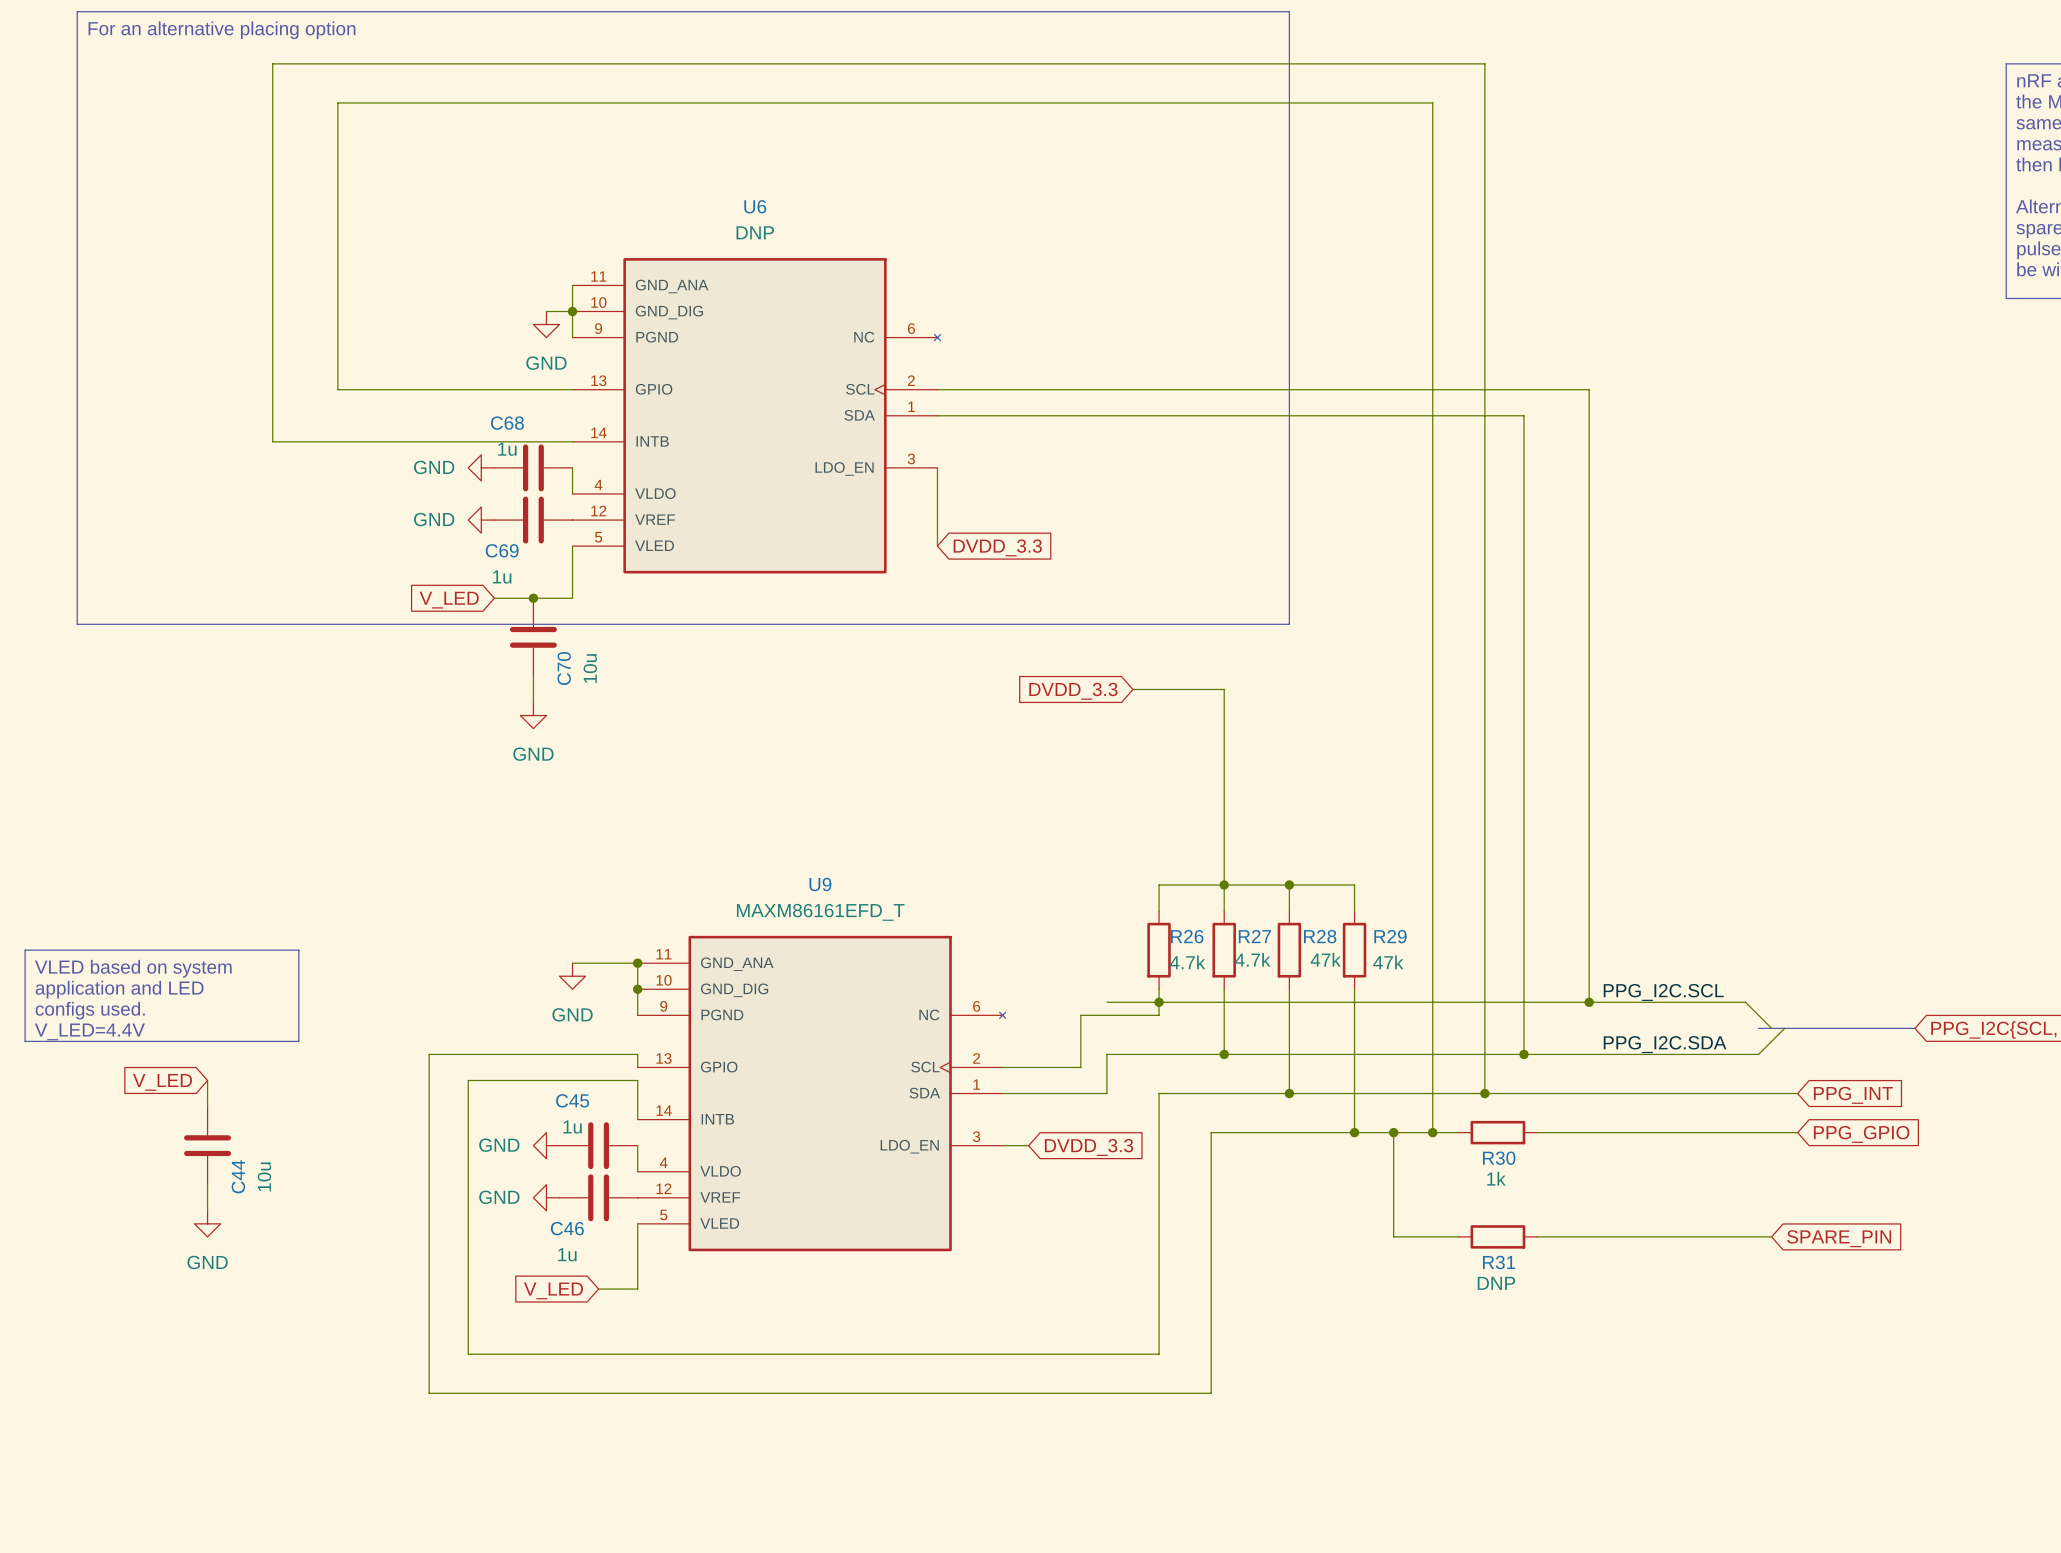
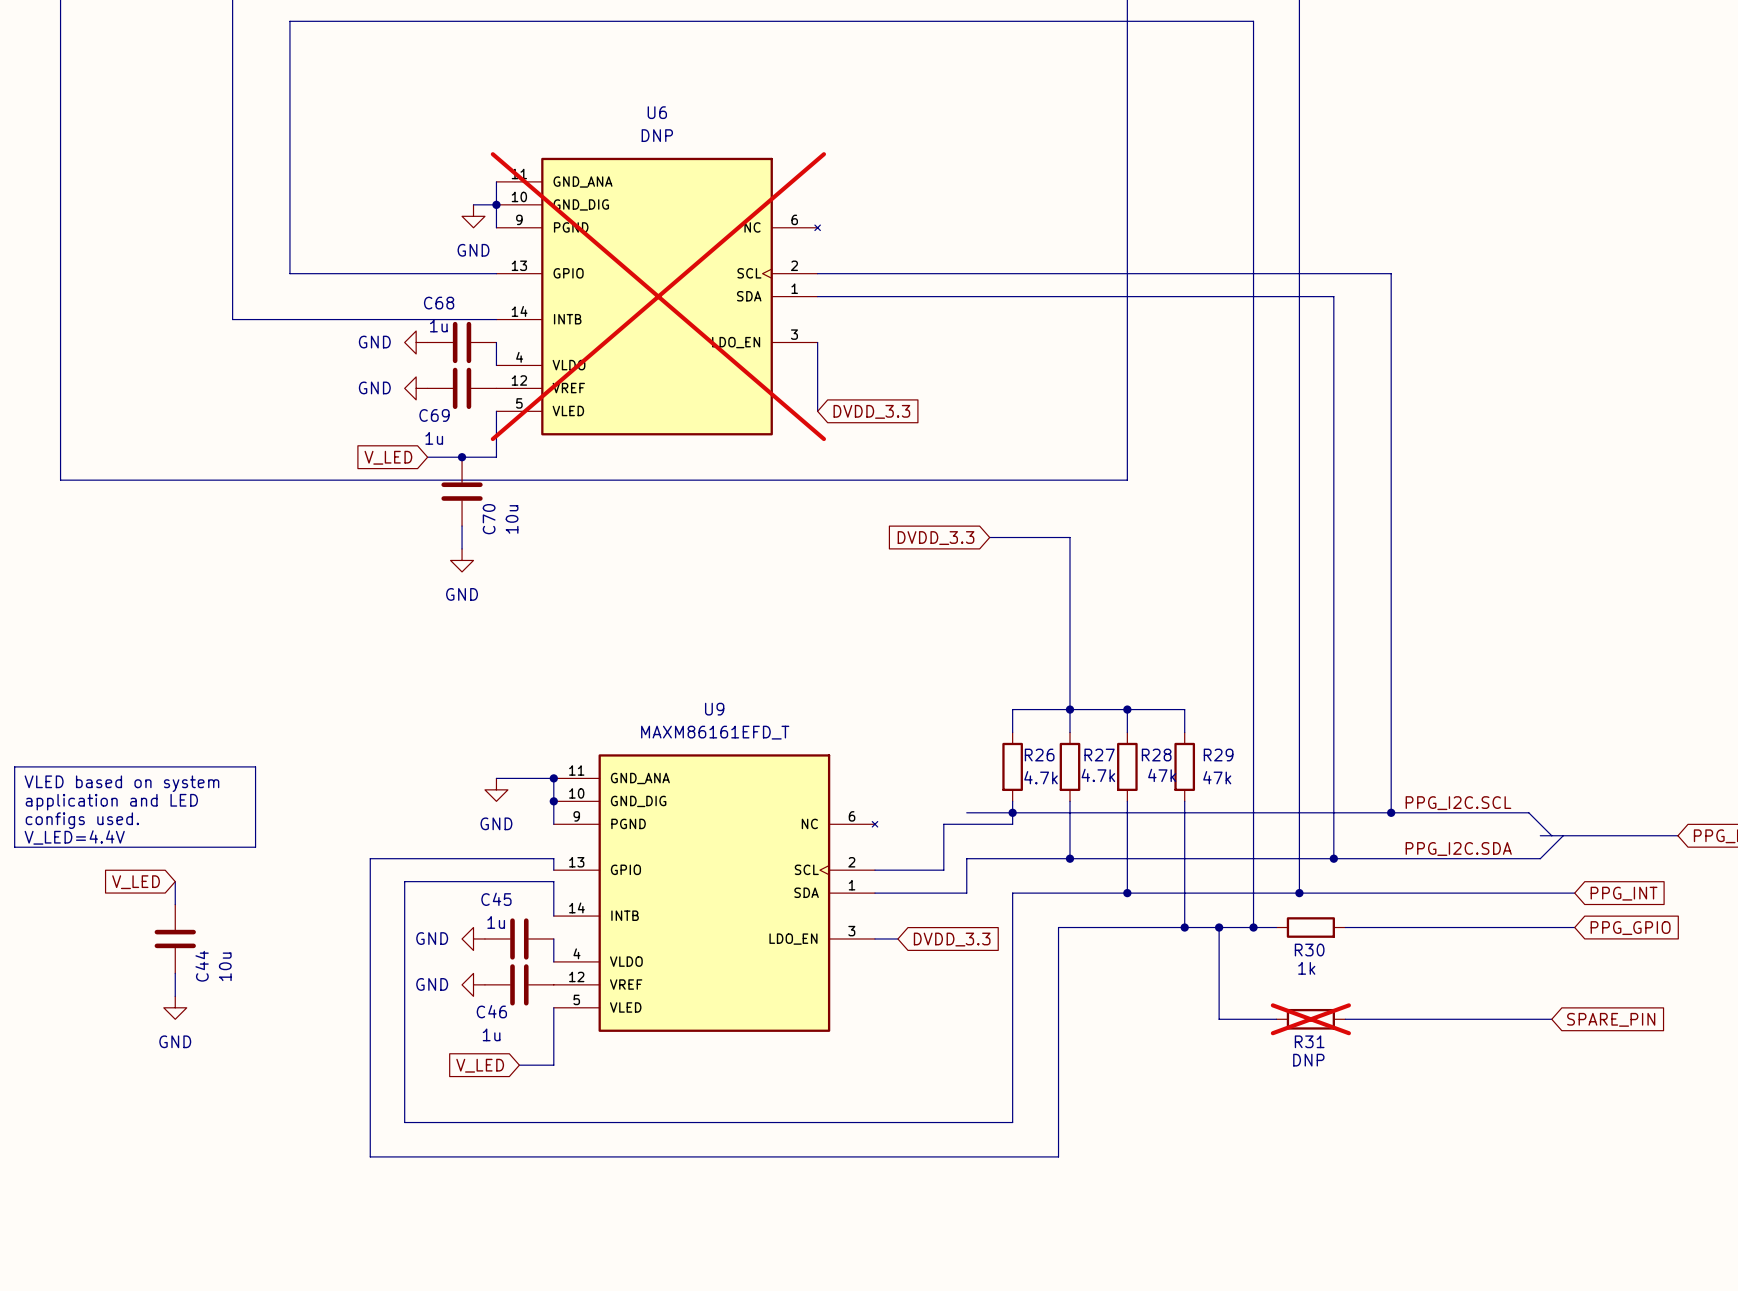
U6 do-not-place cross: none -> (658, 296)
R31 do-not-place cross: none -> (1310, 1019)

